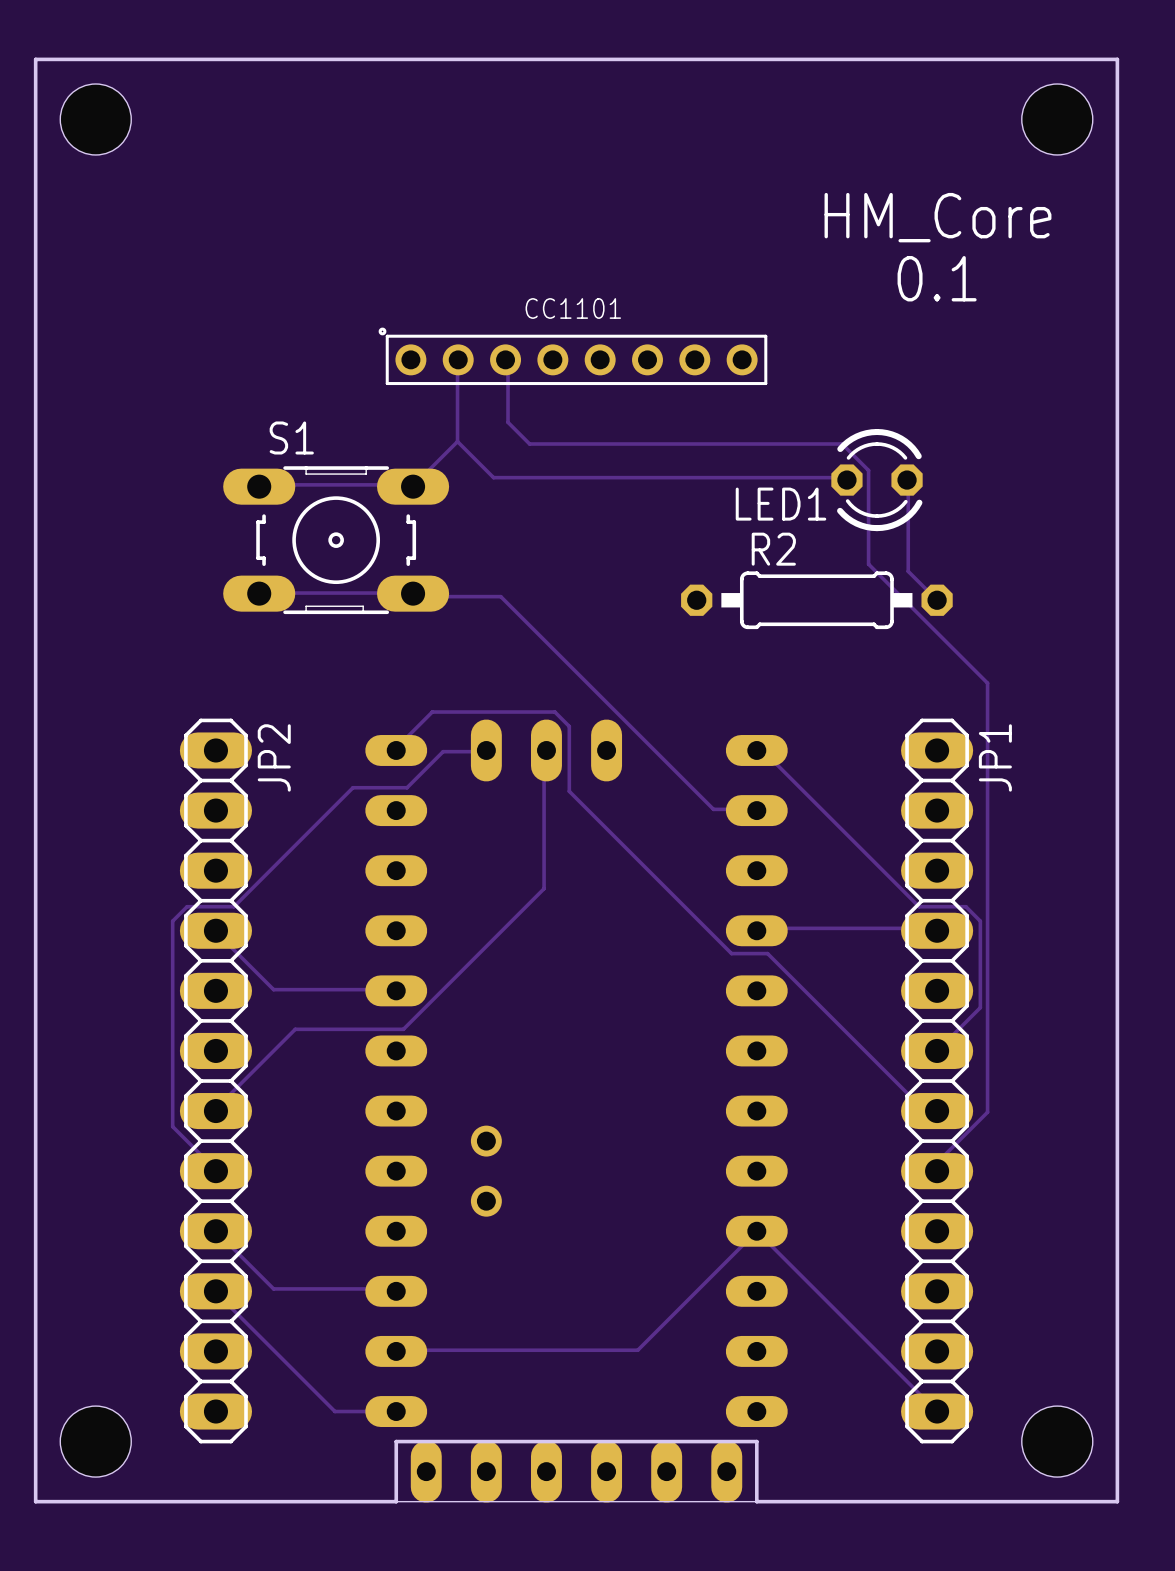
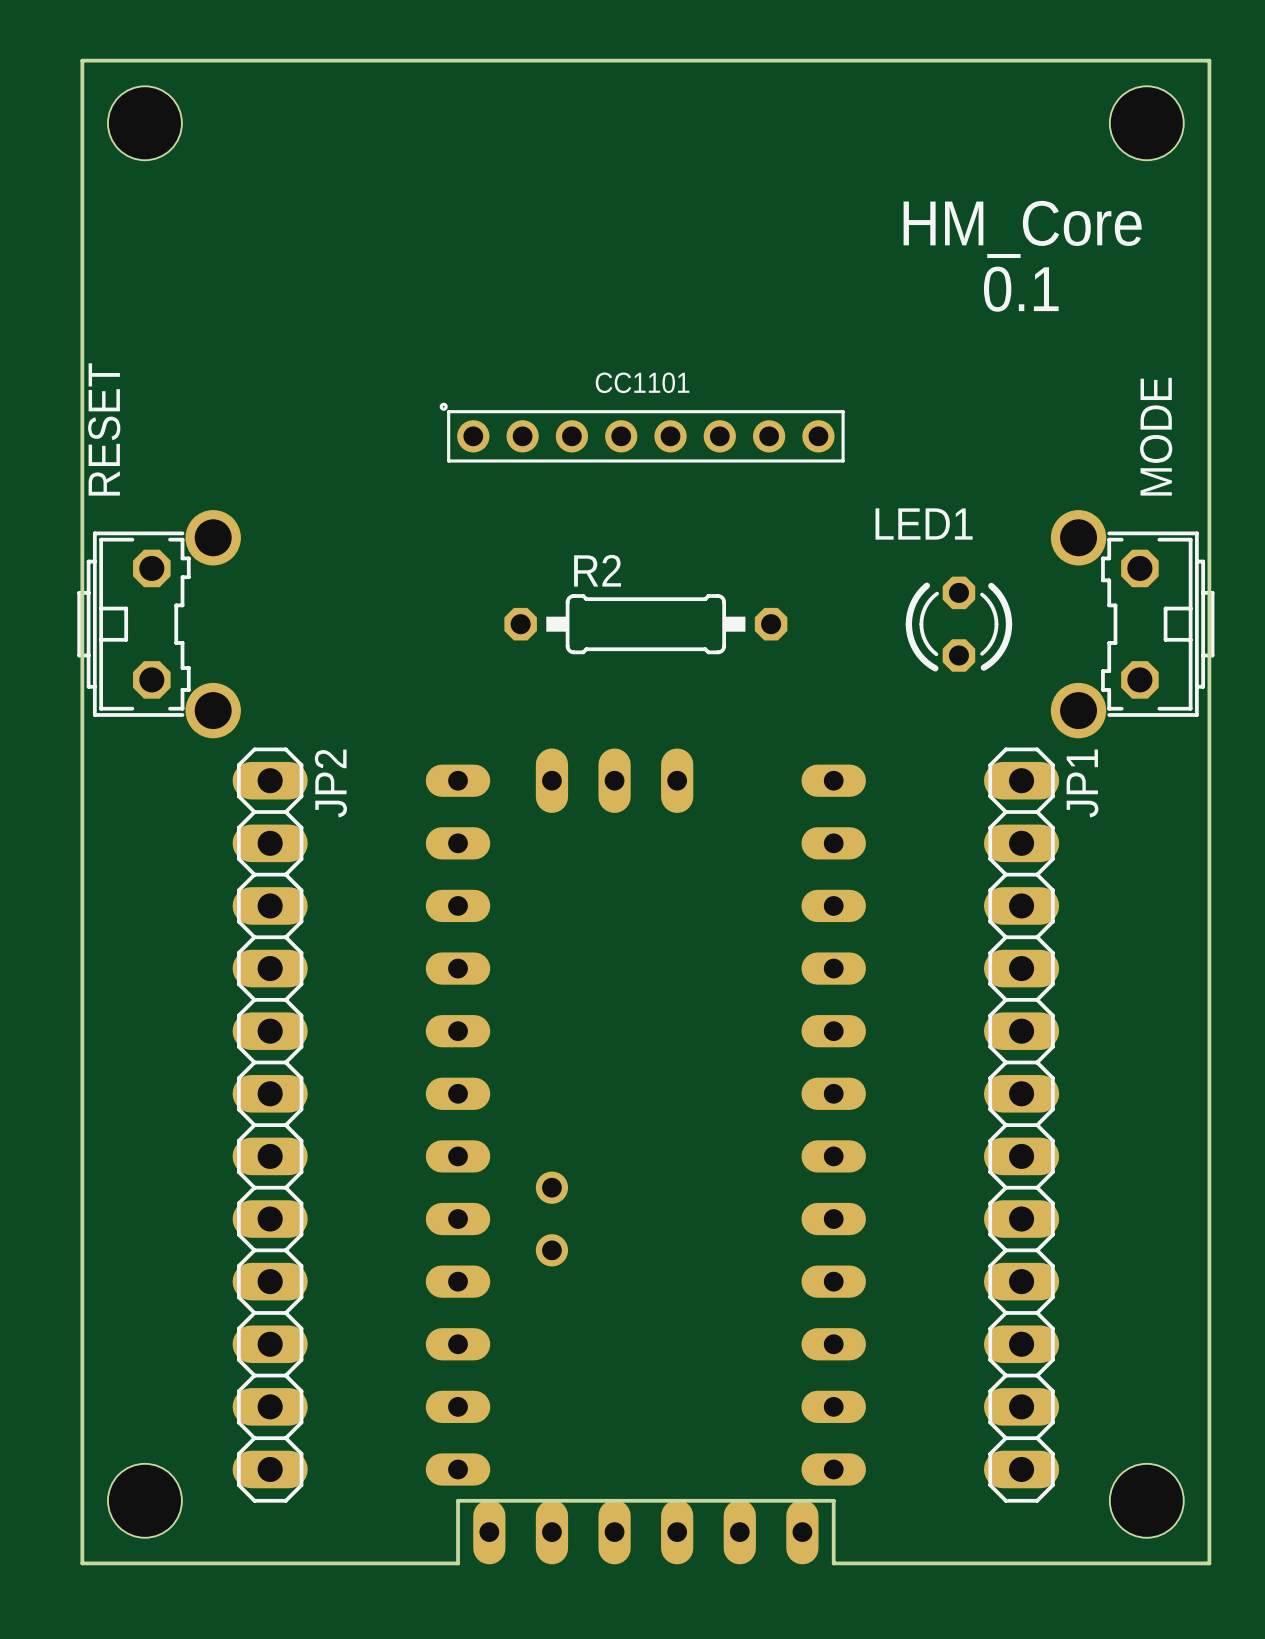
CC1101 position: (572, 356) -> (642, 432)
track: (458, 359) (457, 441) -> none
track: (505, 359) (508, 362) (508, 422) (529, 444) (842, 444) (868, 470) (868, 564) (987, 683) (987, 1112) (937, 1162) (937, 1171) -> none
track: (457, 441) (413, 486) (410, 484) (259, 484) (259, 486) -> none
track: (457, 441) (493, 477) (846, 477) (846, 480) -> none
LED1 rotation: 0° (876, 480) -> 90° clockwise (958, 624)
LED1 position: (876, 480) -> (958, 624)
track: (907, 480) (908, 571) (937, 600) -> none
S1: (336, 540) -> none
track: (259, 593) (410, 593) (414, 596) (500, 596) (713, 809) (756, 810) -> none
RESET: none -> (159, 624)
R2 position: (816, 600) -> (645, 624)
MODE: none -> (1132, 624)
track: (396, 750) (396, 748) (432, 712) (554, 712) (569, 726) (569, 791) (731, 953) (767, 953) (922, 1108) (937, 1108) (937, 1111) -> none
track: (486, 750) (443, 751) (407, 787) (352, 787) (233, 906) (187, 906) (172, 921) (172, 1126) (215, 1171) -> none
track: (546, 750) (544, 751) (544, 888) (403, 1029) (295, 1029) (215, 1108) (215, 1111) -> none
track: (756, 750) (764, 751) (919, 906) (965, 906) (980, 921) (980, 1007) (937, 1050) -> none
track: (756, 928) (937, 928) -> none
track: (215, 930) (273, 989) (396, 990) -> none
track: (215, 1231) (273, 1288) (396, 1288) (396, 1291) -> none
track: (215, 1291) (334, 1411) (396, 1411) -> none
track: (396, 1351) (637, 1350) (756, 1231) (937, 1411) -> none
board edge: (396, 1501) (756, 1501) -> none

